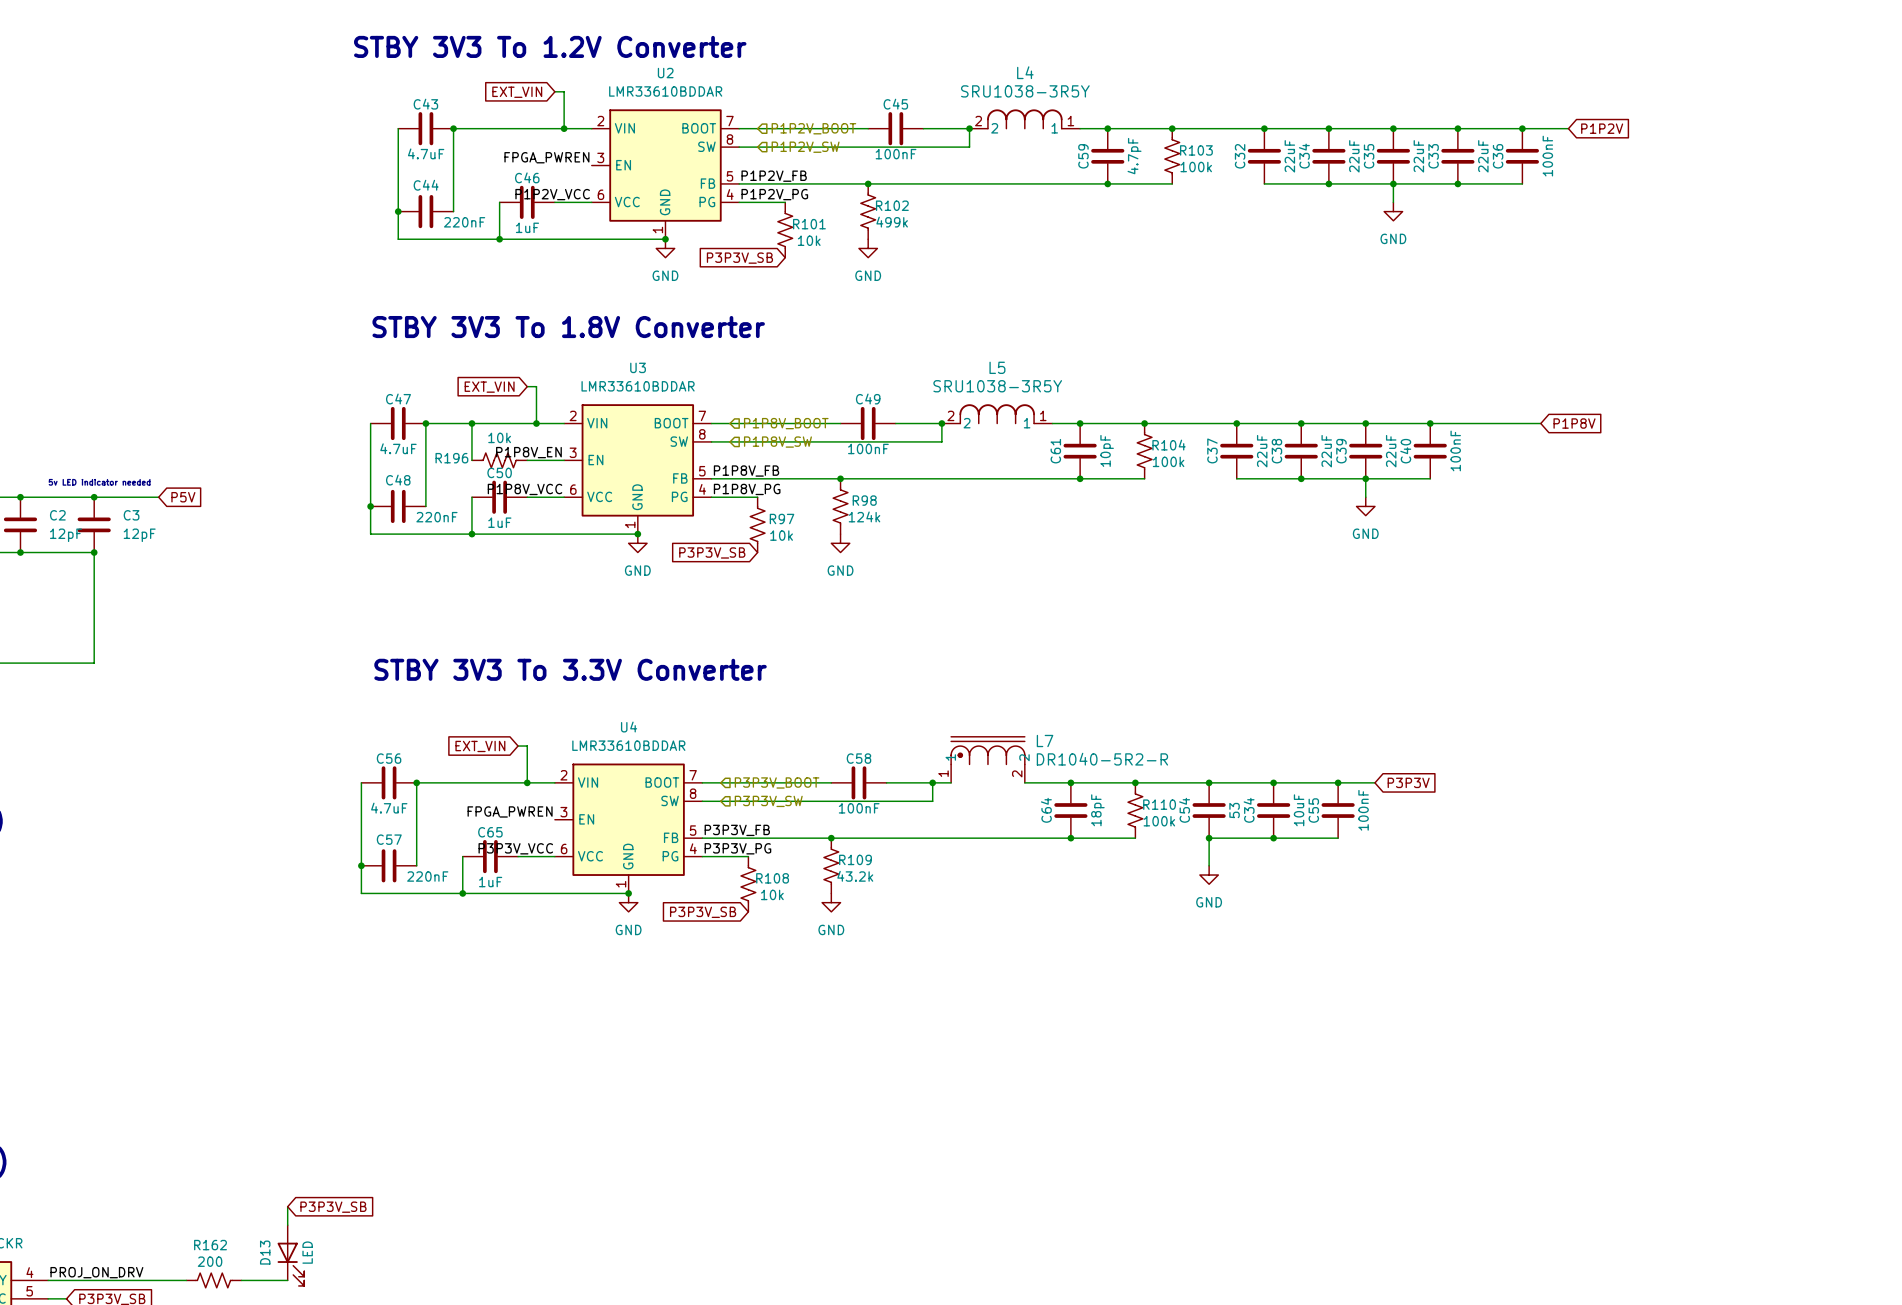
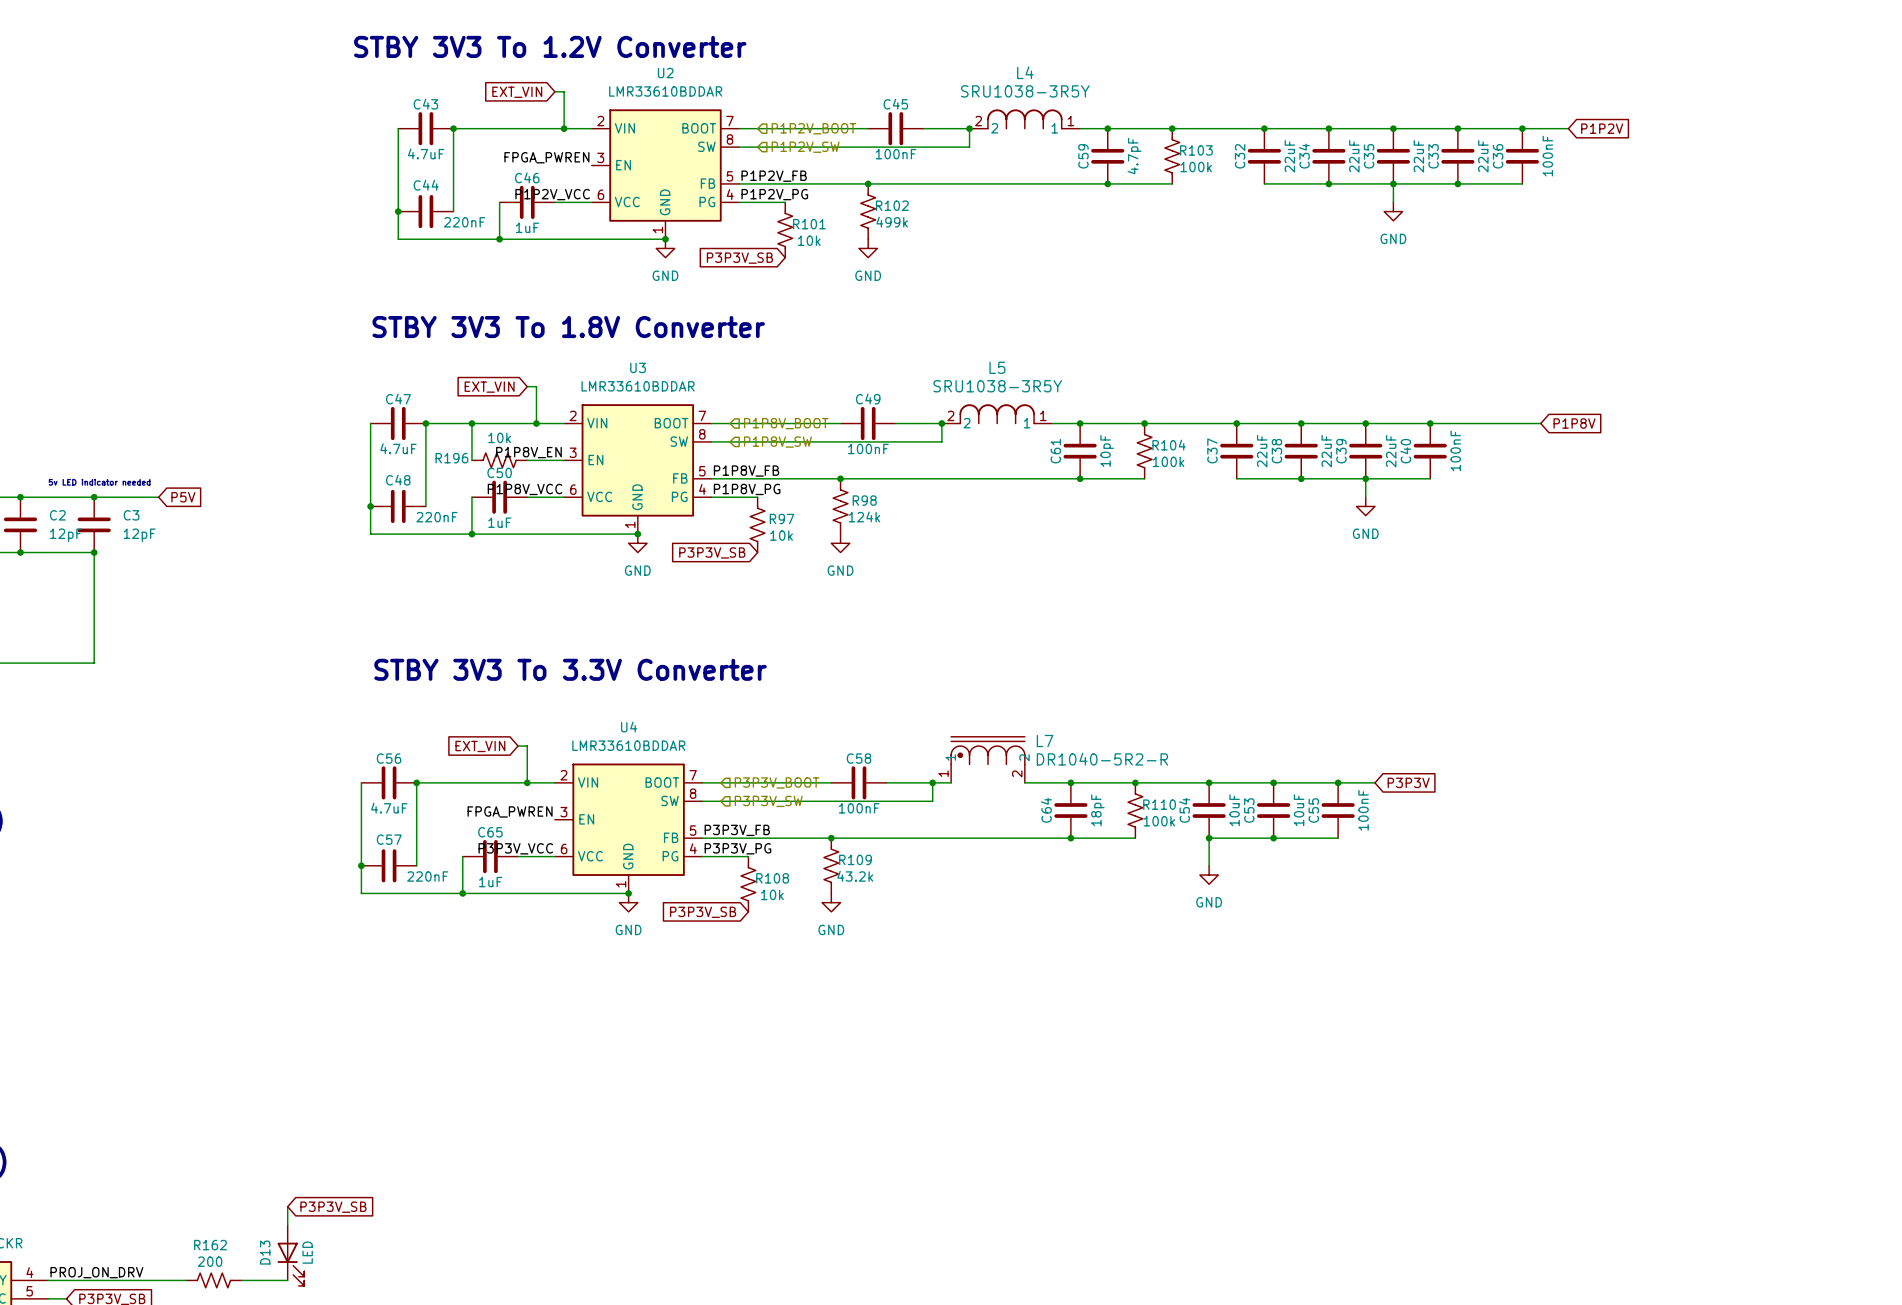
C54 value: 53 (1234, 810) -> 10uF (1234, 810)
C34 name: C34 (1249, 810) -> C53 (1249, 810)

